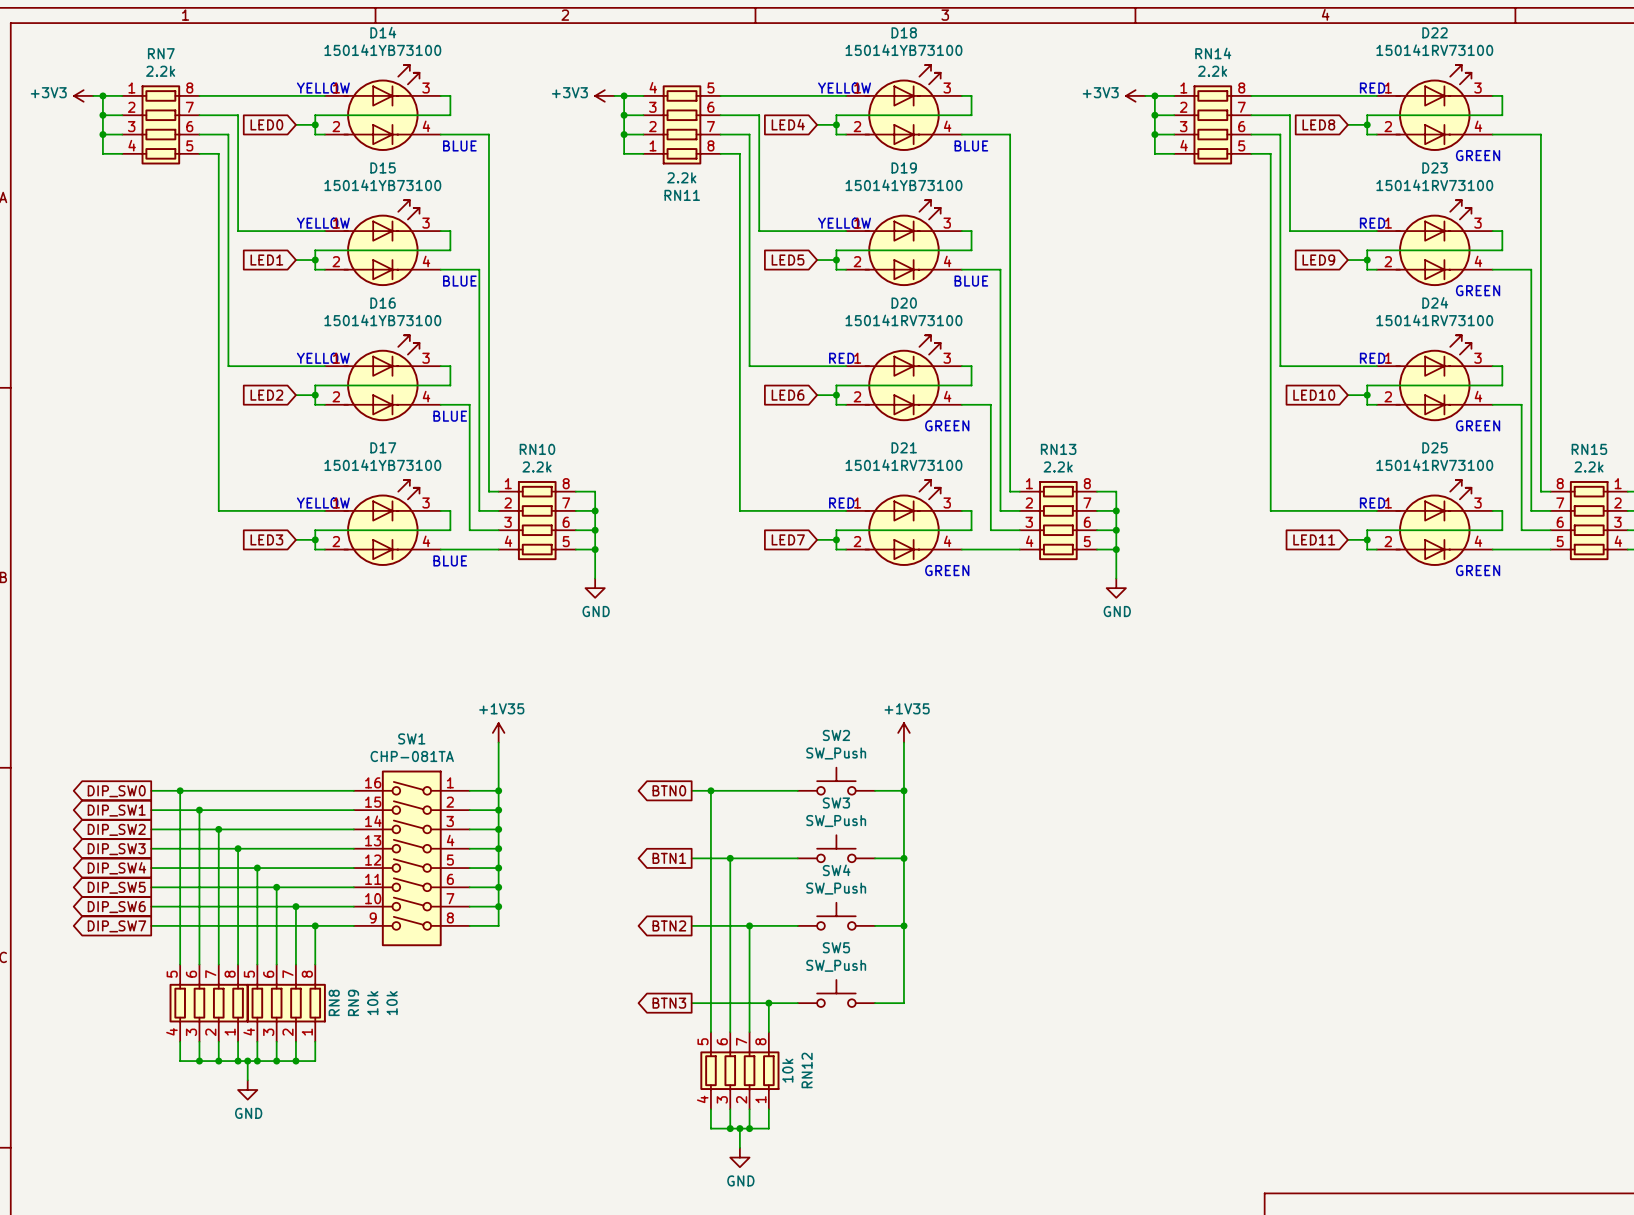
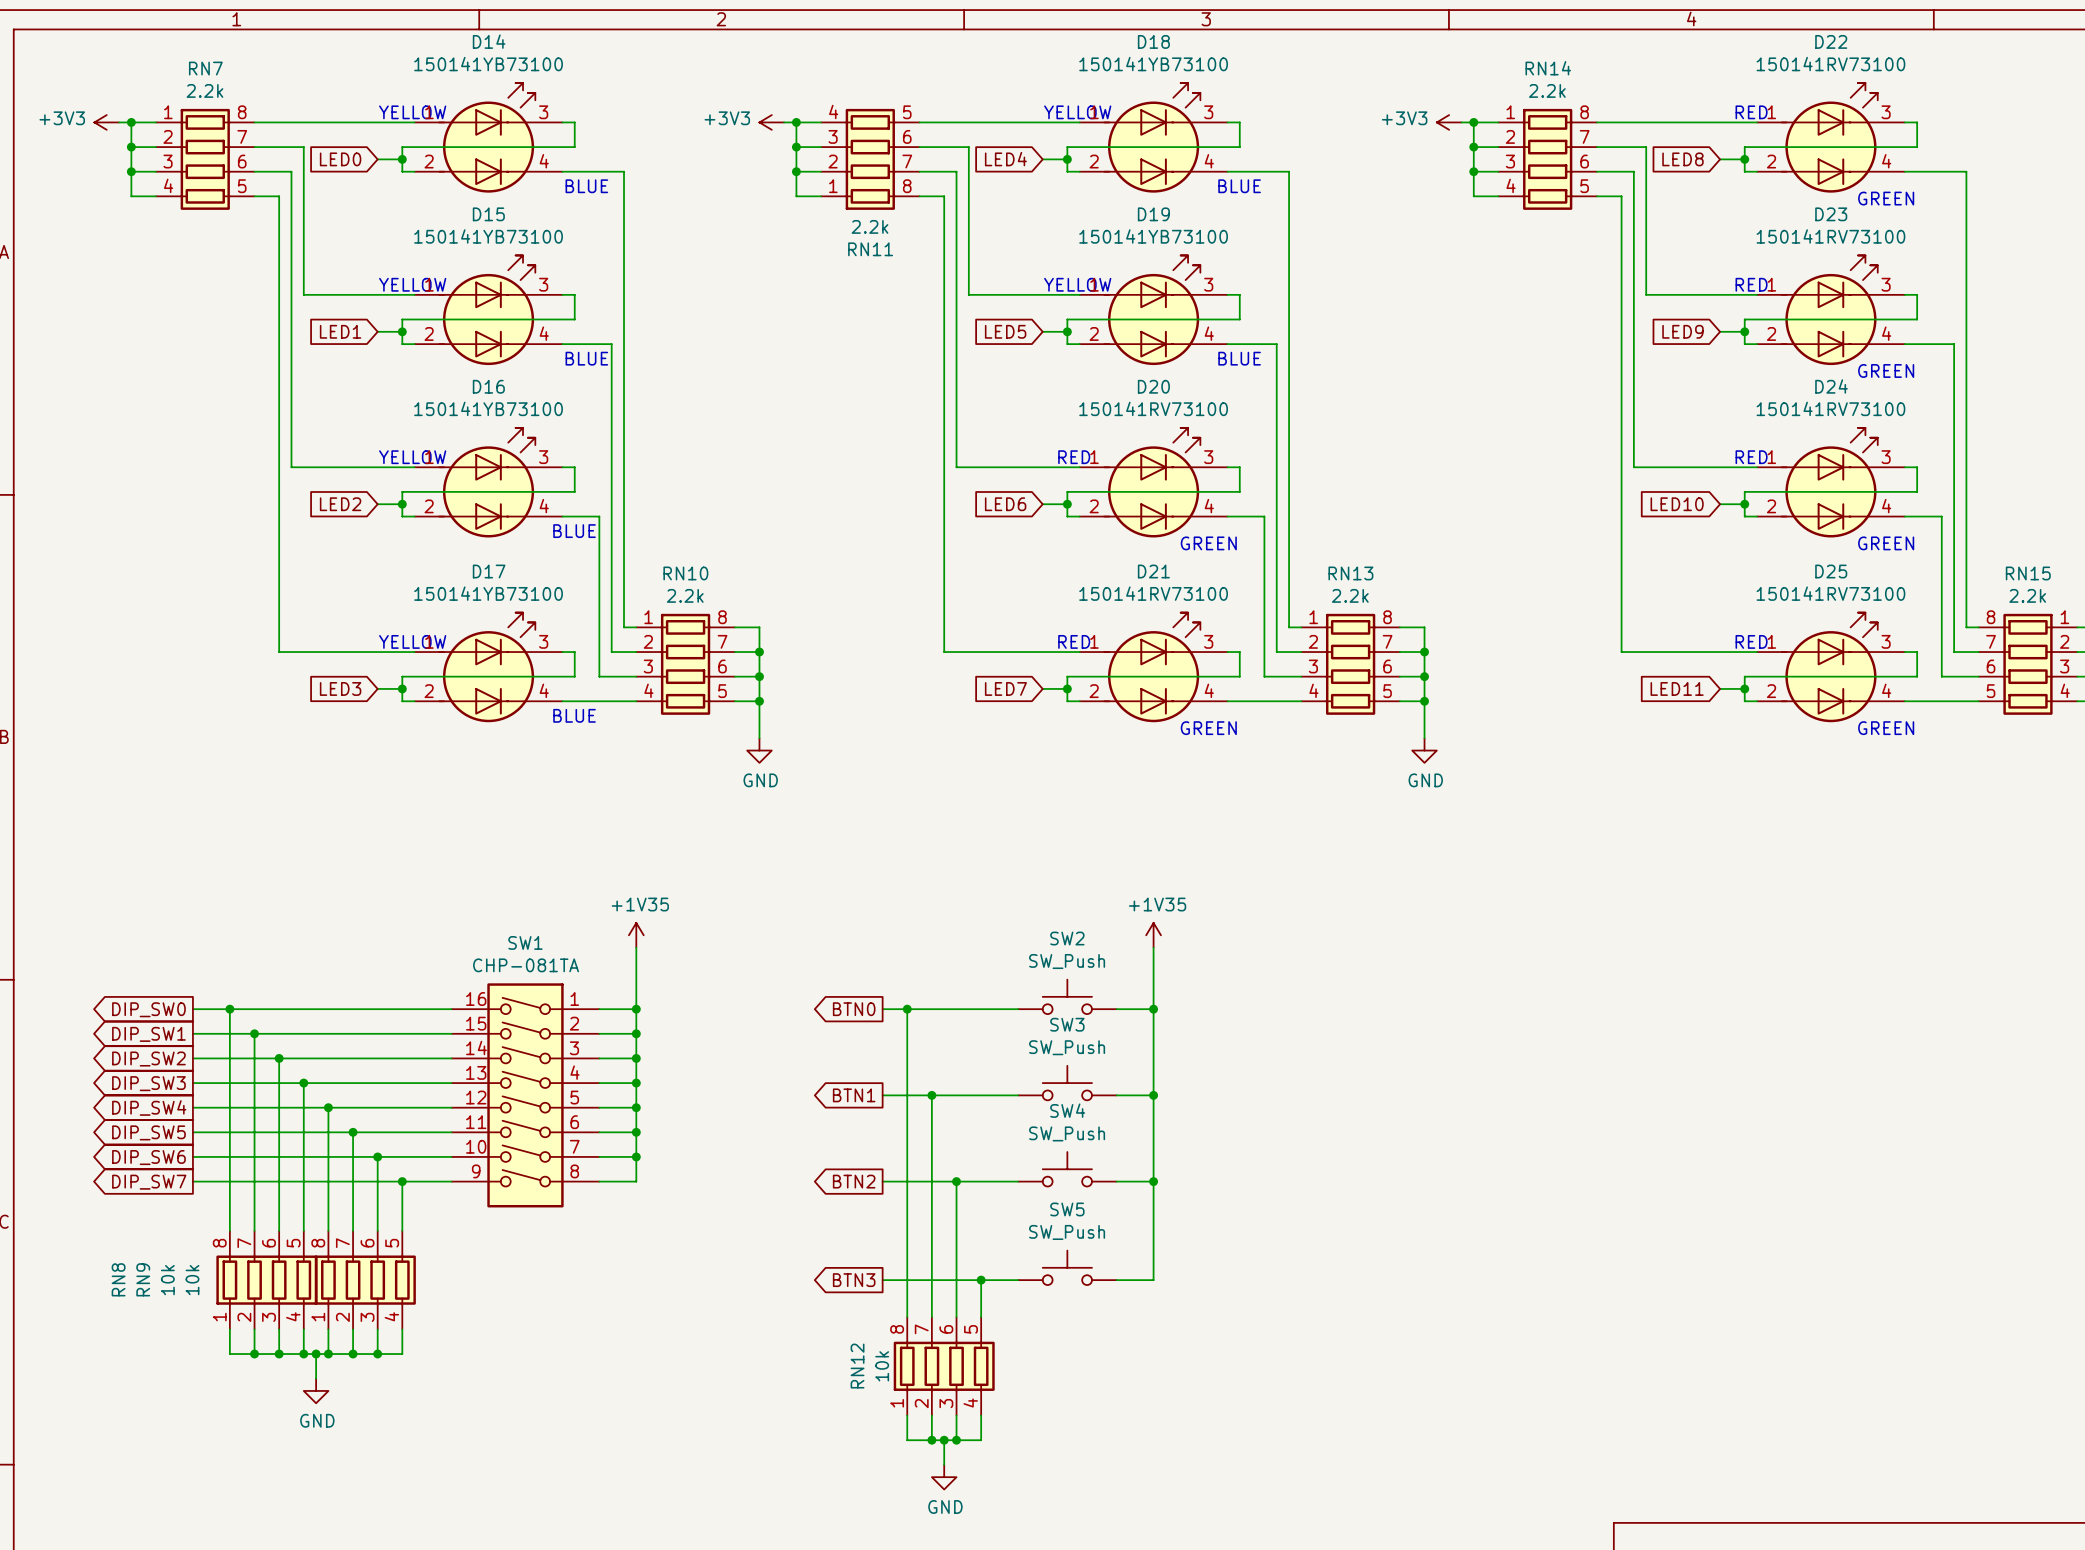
RN9 name position: RN9 (353, 1002) -> RN9 (143, 1279)
RN8 flip: as is (209, 1003) -> left-right (266, 1280)
RN9 flip: as is (286, 1003) -> left-right (365, 1280)
RN8 value position: 10k (372, 1003) -> 10k (167, 1280)
RN9 value position: 10k (392, 1003) -> 10k (192, 1280)
RN12 flip: as is (739, 1070) -> left-right (944, 1366)

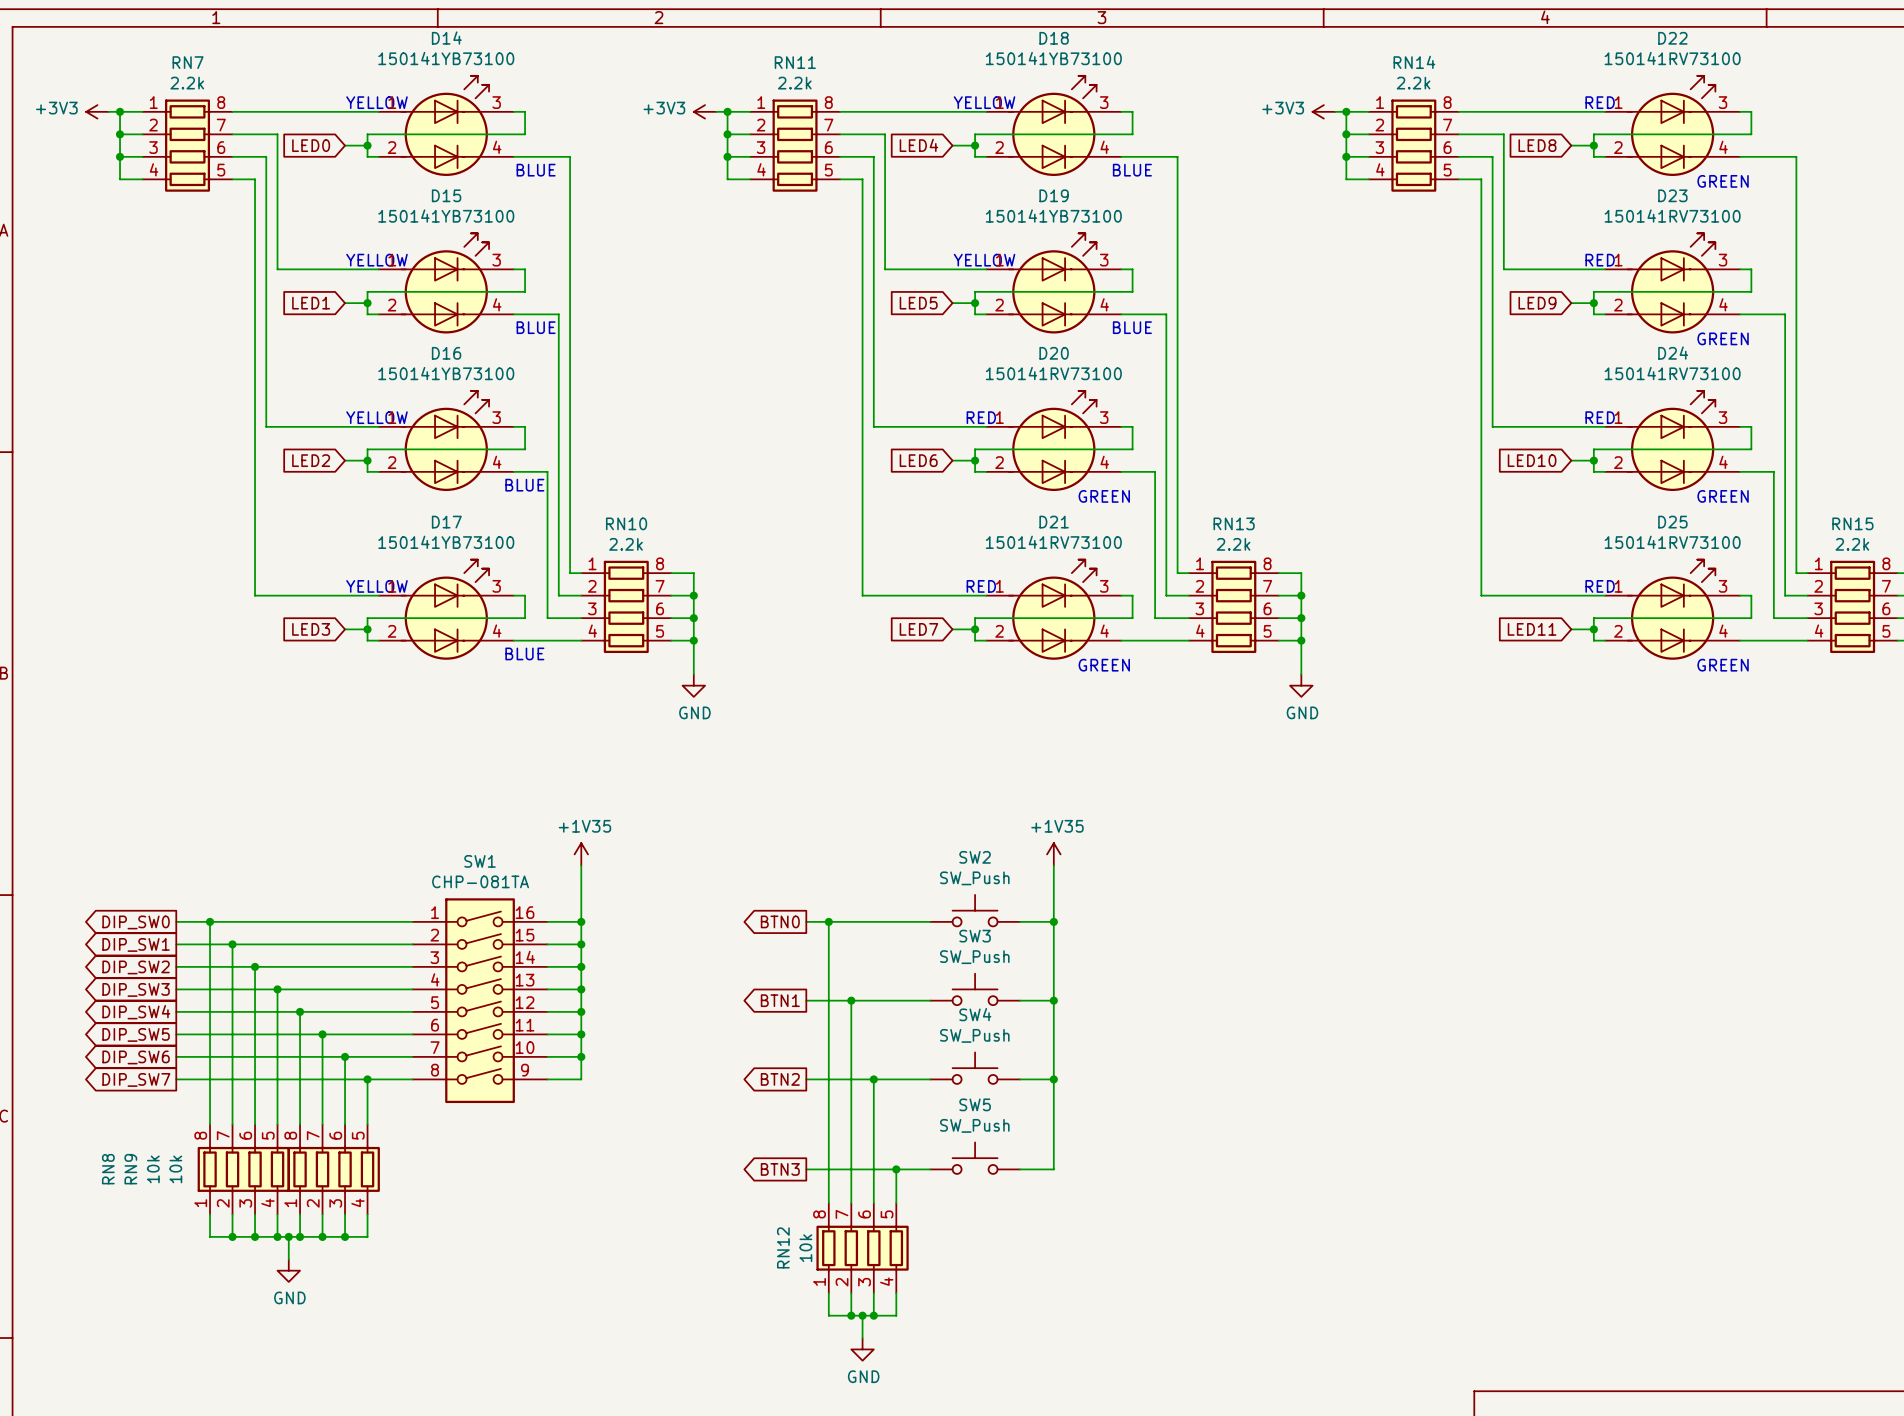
RN11 flip: as is (870, 159) -> up-down (795, 145)
RN15 flip: as is (2027, 664) -> left-right (1852, 606)
SW1 flip: as is (525, 1095) -> left-right (480, 1000)

